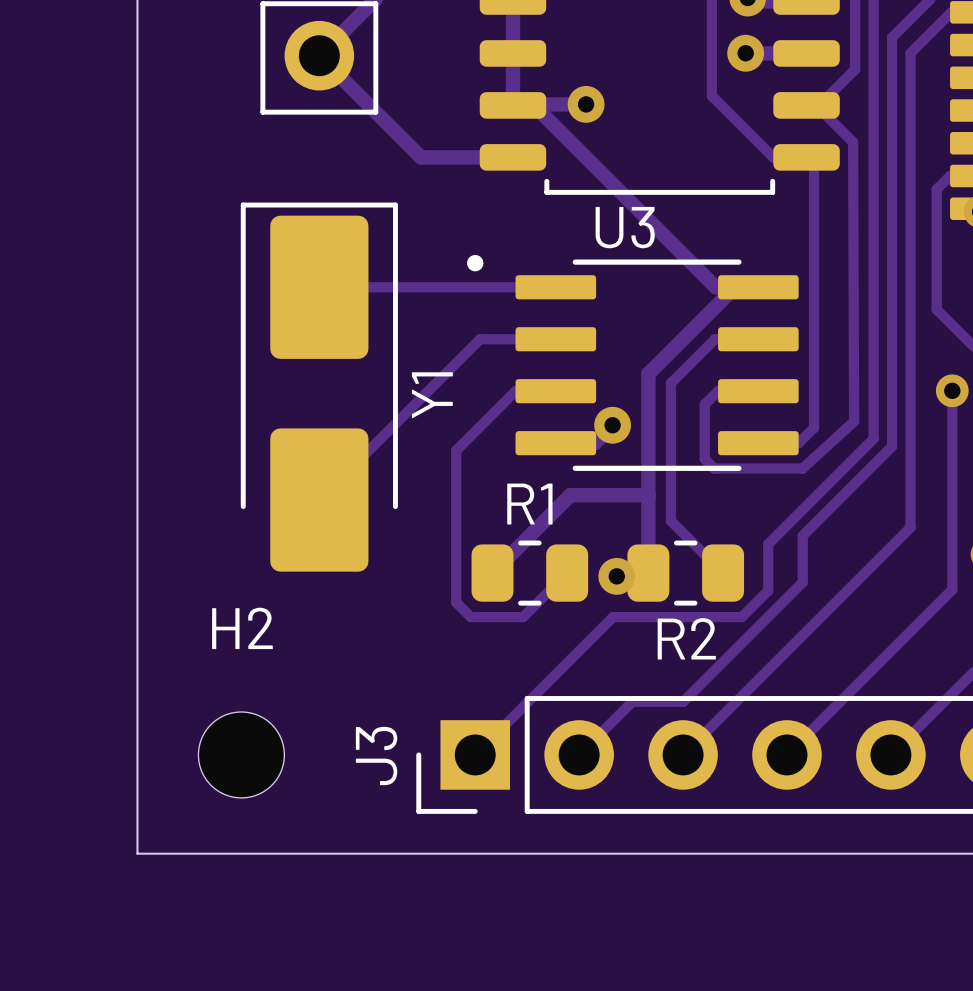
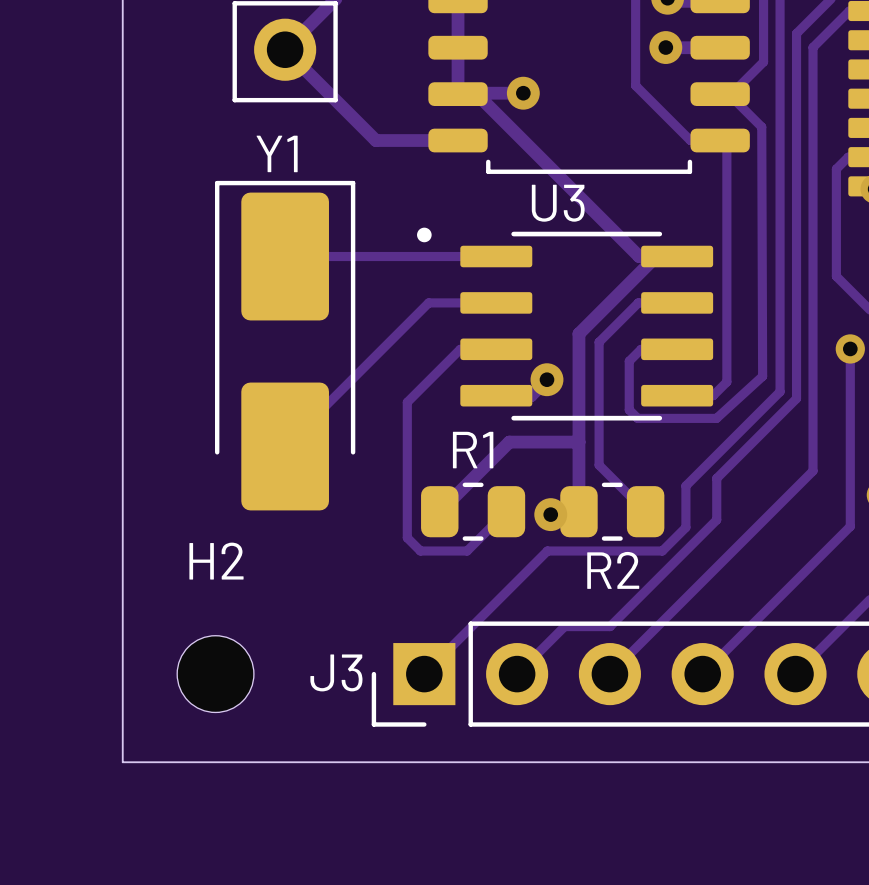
Y1 name rotation: 0° (432, 395) -> 90° clockwise (277, 153)
Y1 name position: Y1 (432, 395) -> Y1 (277, 153)
J3 name rotation: 0° (376, 755) -> 90° clockwise (336, 672)

